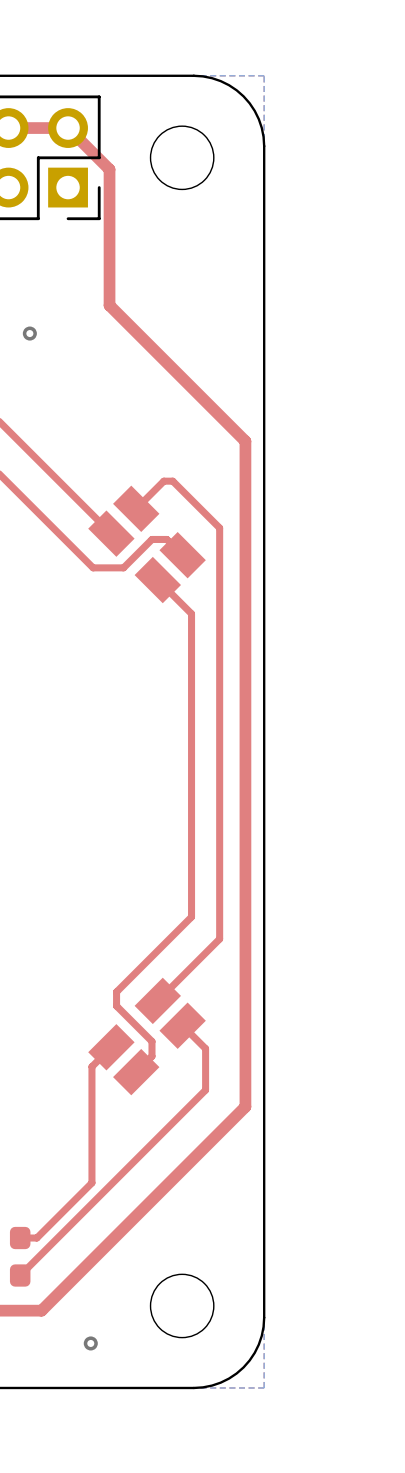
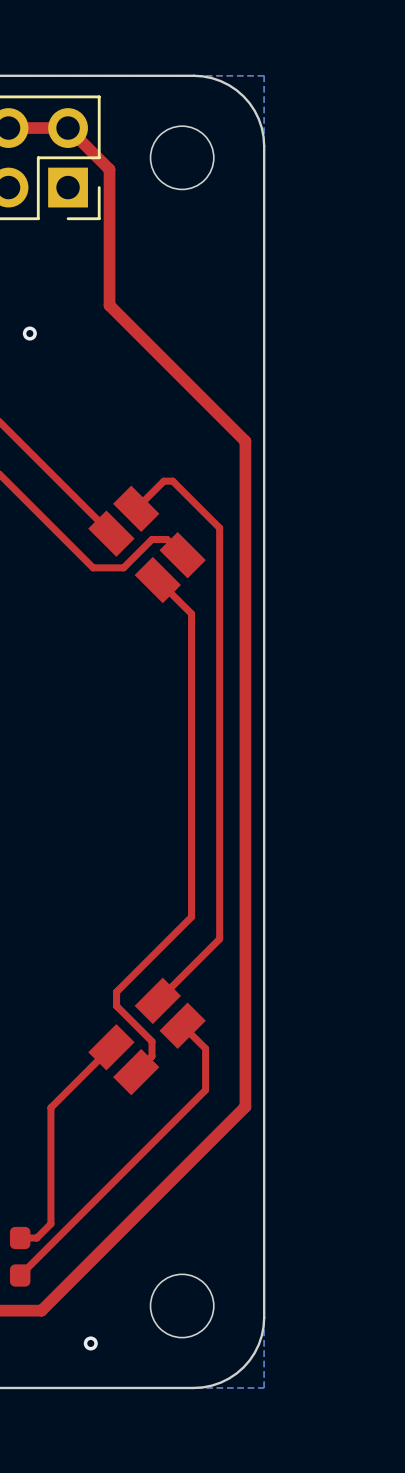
top track: (91, 1066) (91, 1182) (50, 1223) -> (91, 1066) (50, 1107) (50, 1223)

